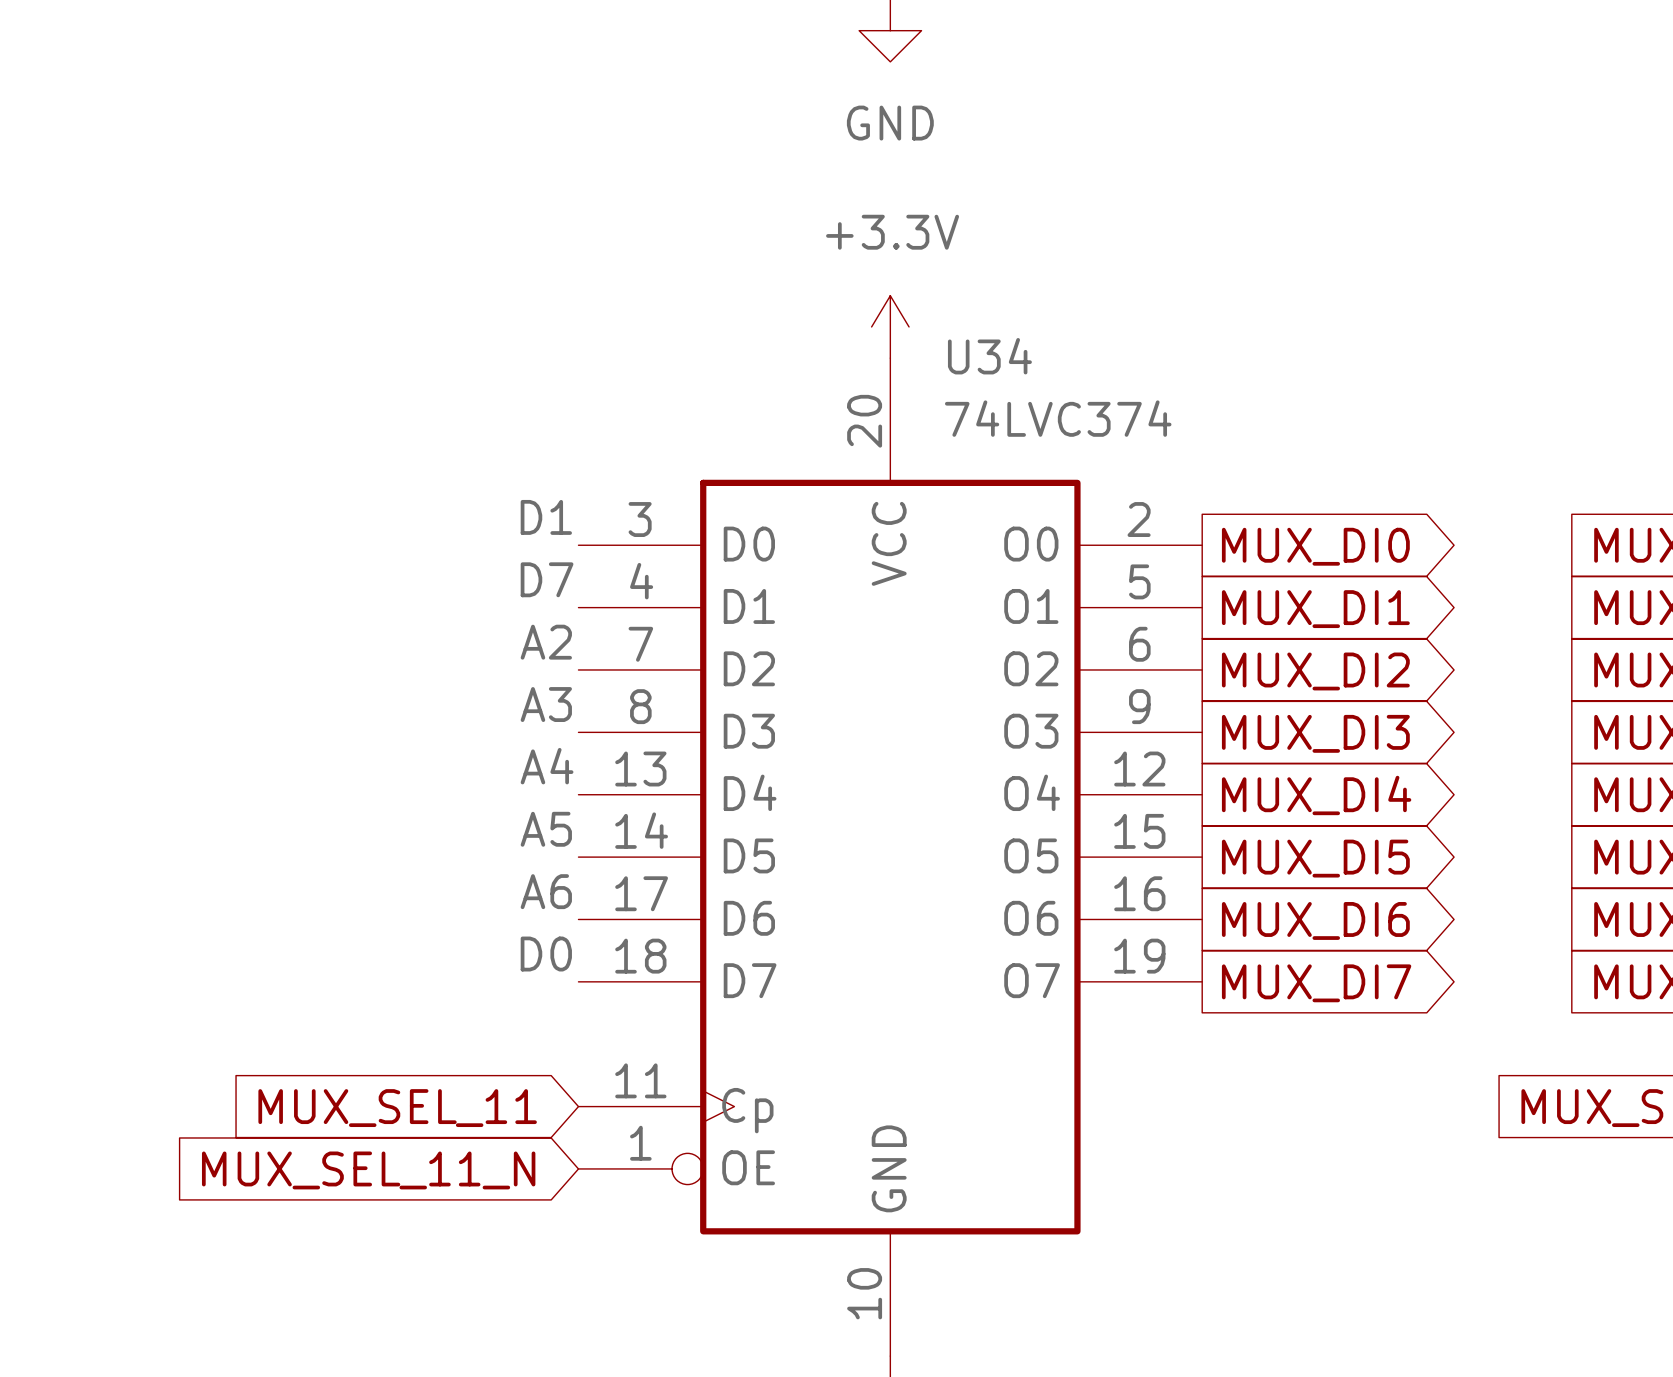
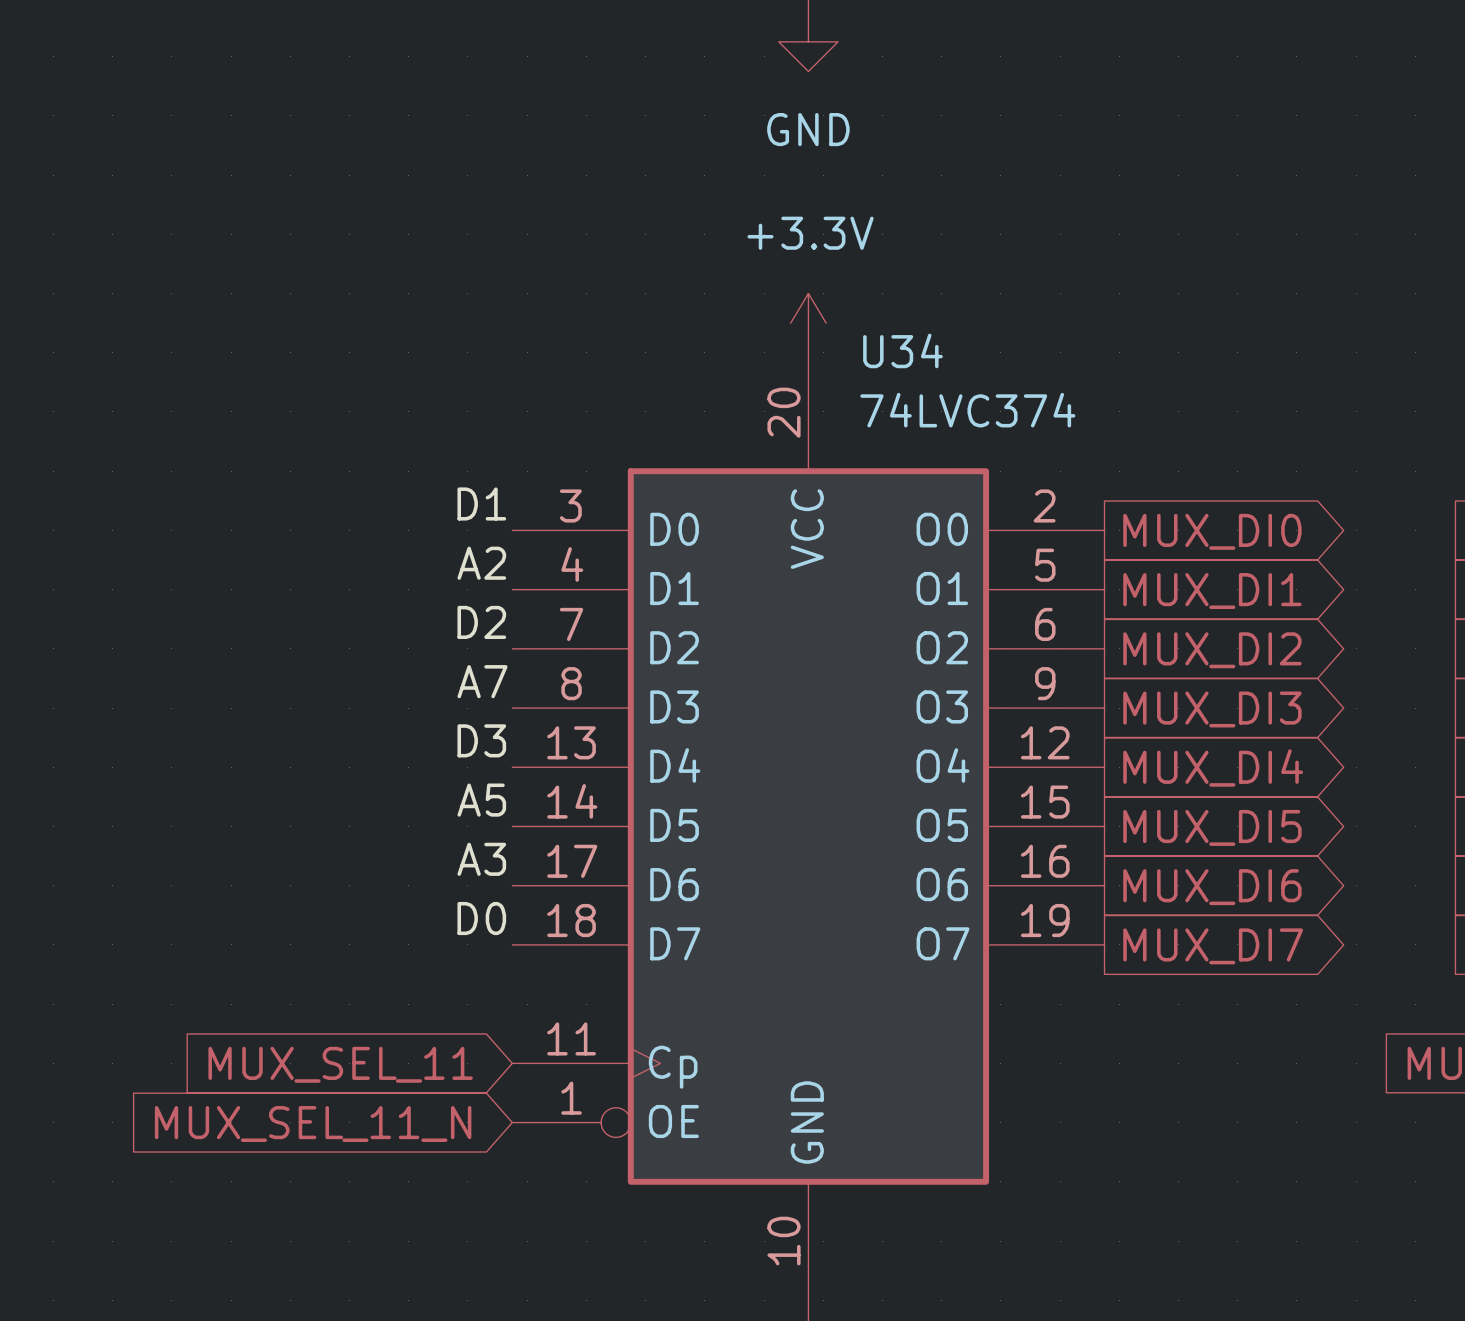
label: D7 (547, 579) -> A2 (481, 563)
label: A2 (546, 642) -> D2 (481, 622)
label: A3 (546, 704) -> A7 (482, 681)
label: A4 (547, 766) -> D3 (481, 740)
label: A6 (546, 891) -> A3 (481, 859)

